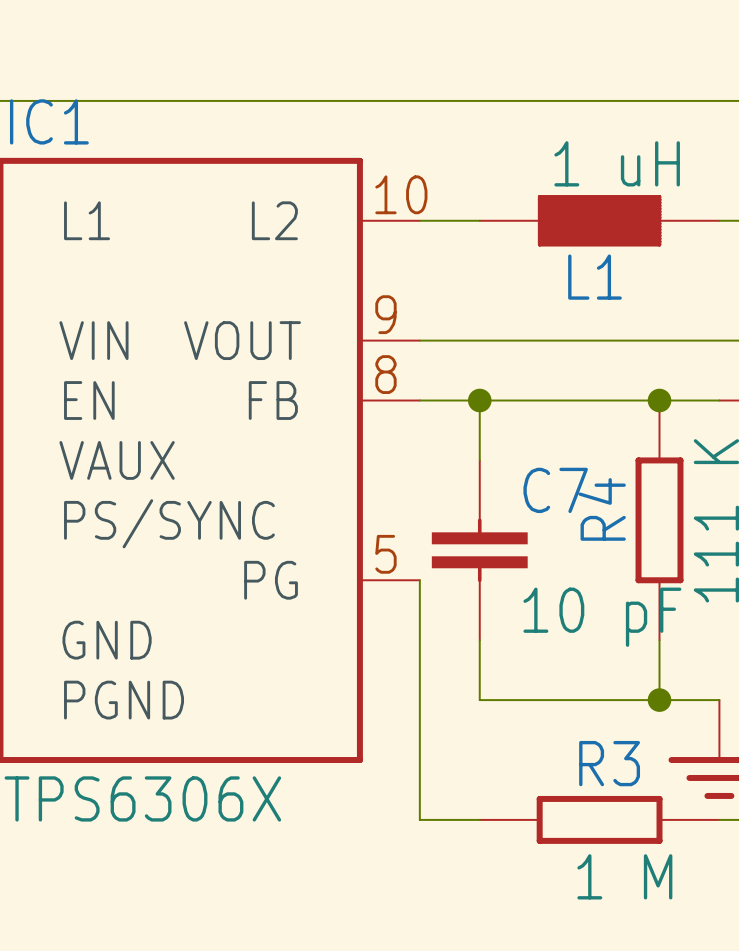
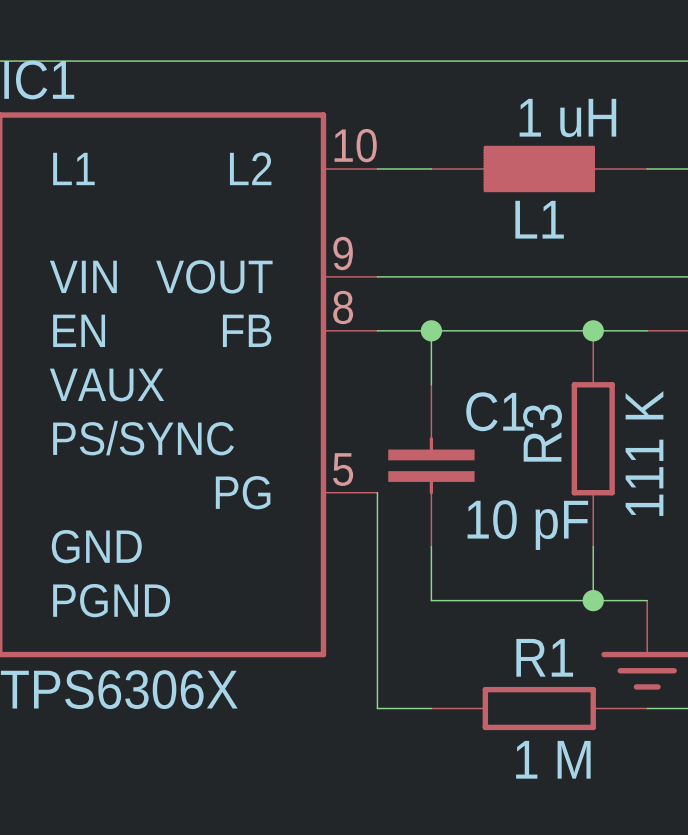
C7 name: C7 (555, 490) -> C1 (495, 411)
R4 name: R4 (602, 509) -> R3 (542, 433)
R3 name: R3 (609, 763) -> R1 (544, 657)

